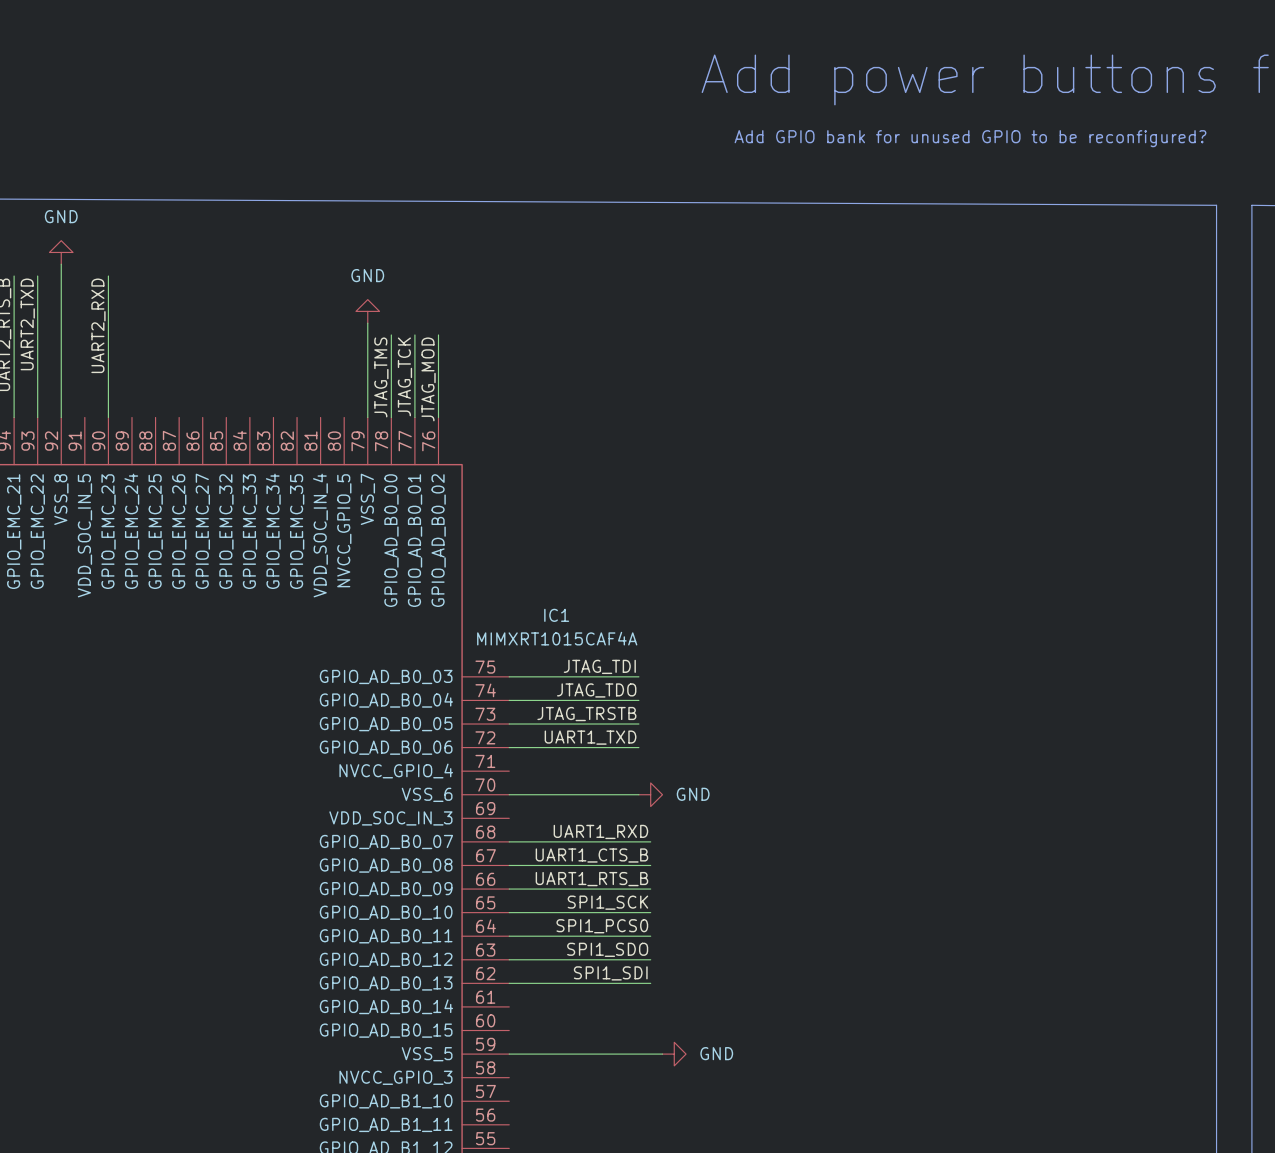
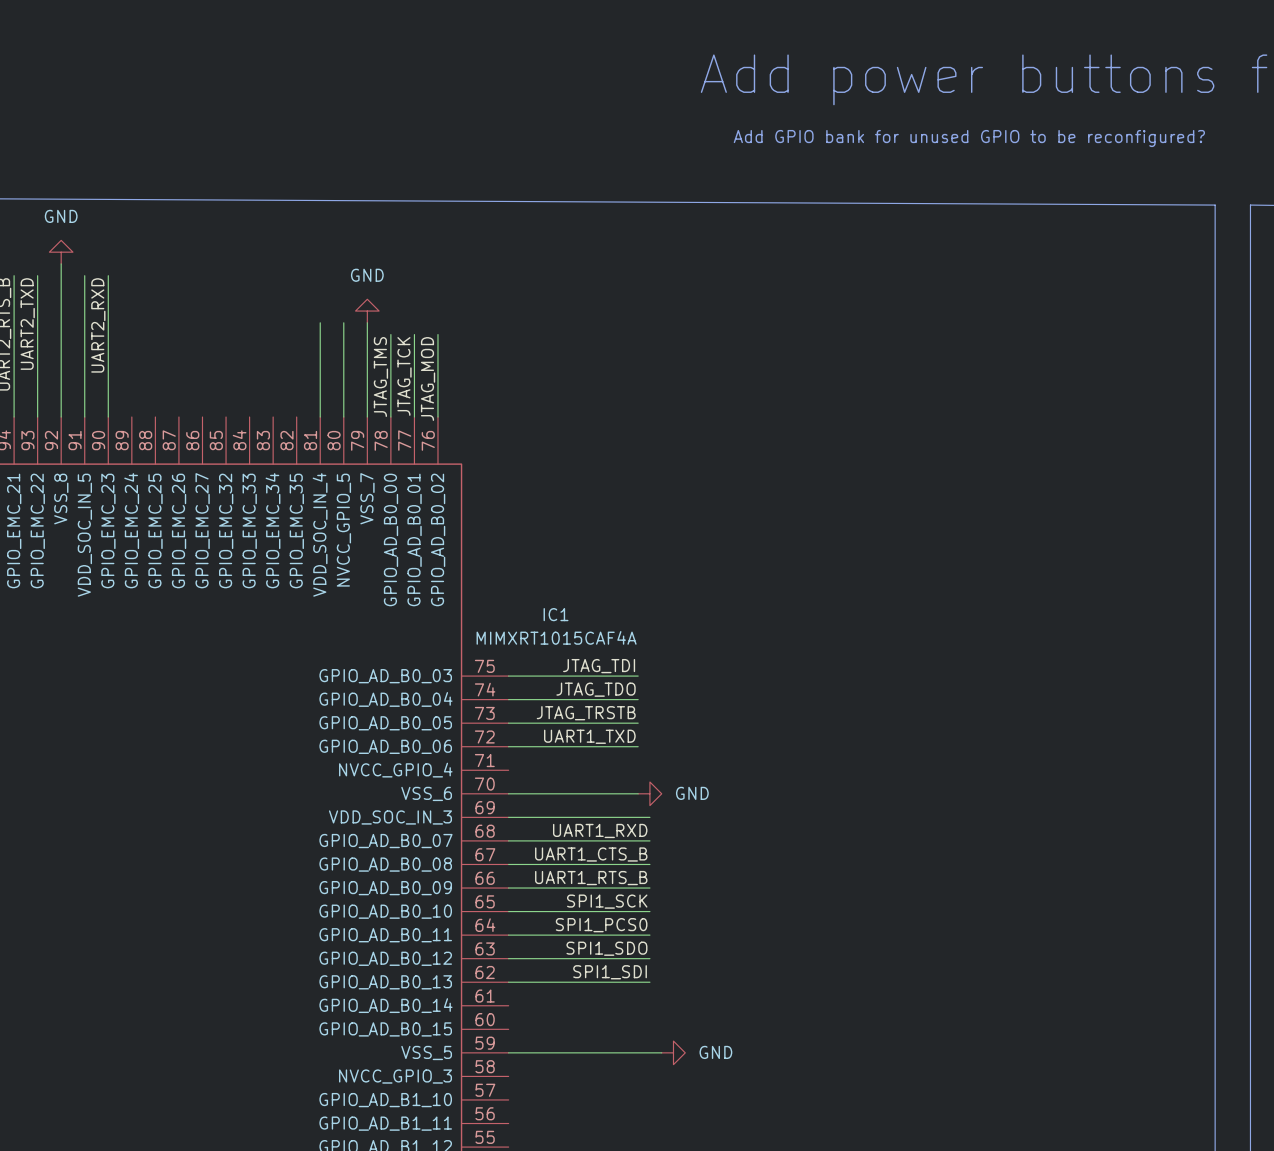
wire: none -> (84, 275) (84, 417)
wire: none -> (320, 322) (320, 417)
wire: none -> (343, 322) (343, 417)
wire: none -> (508, 817) (649, 817)

